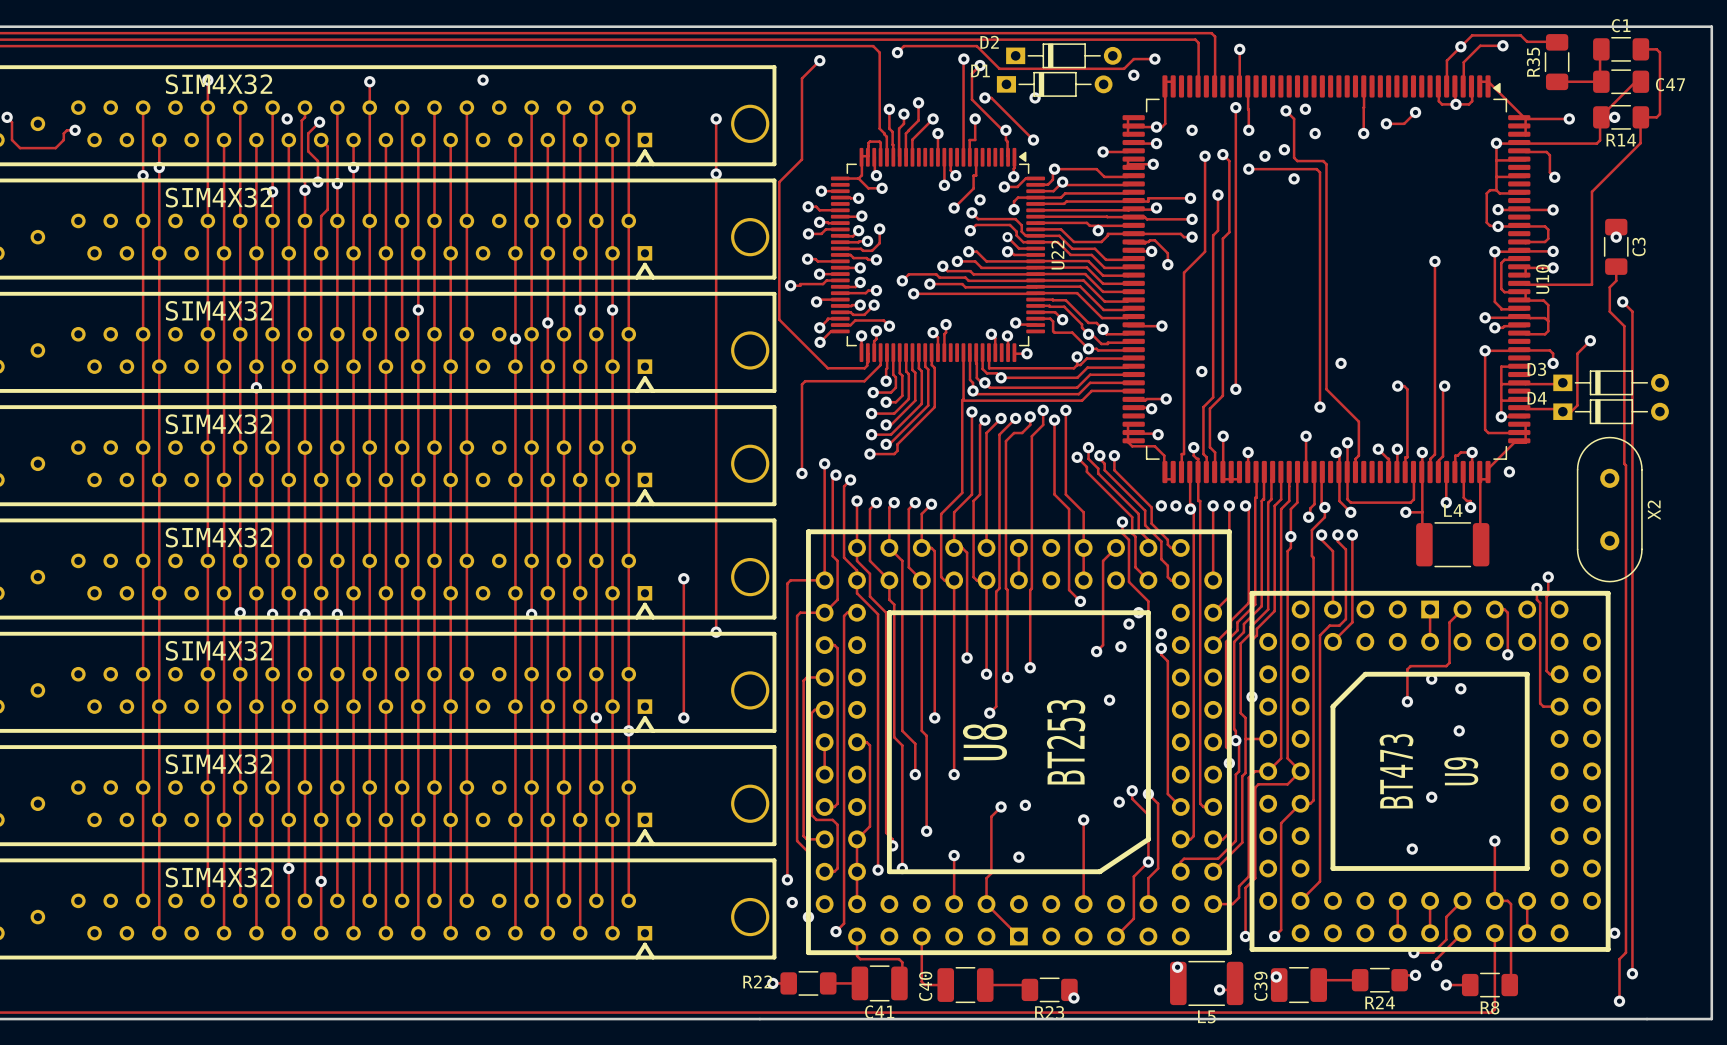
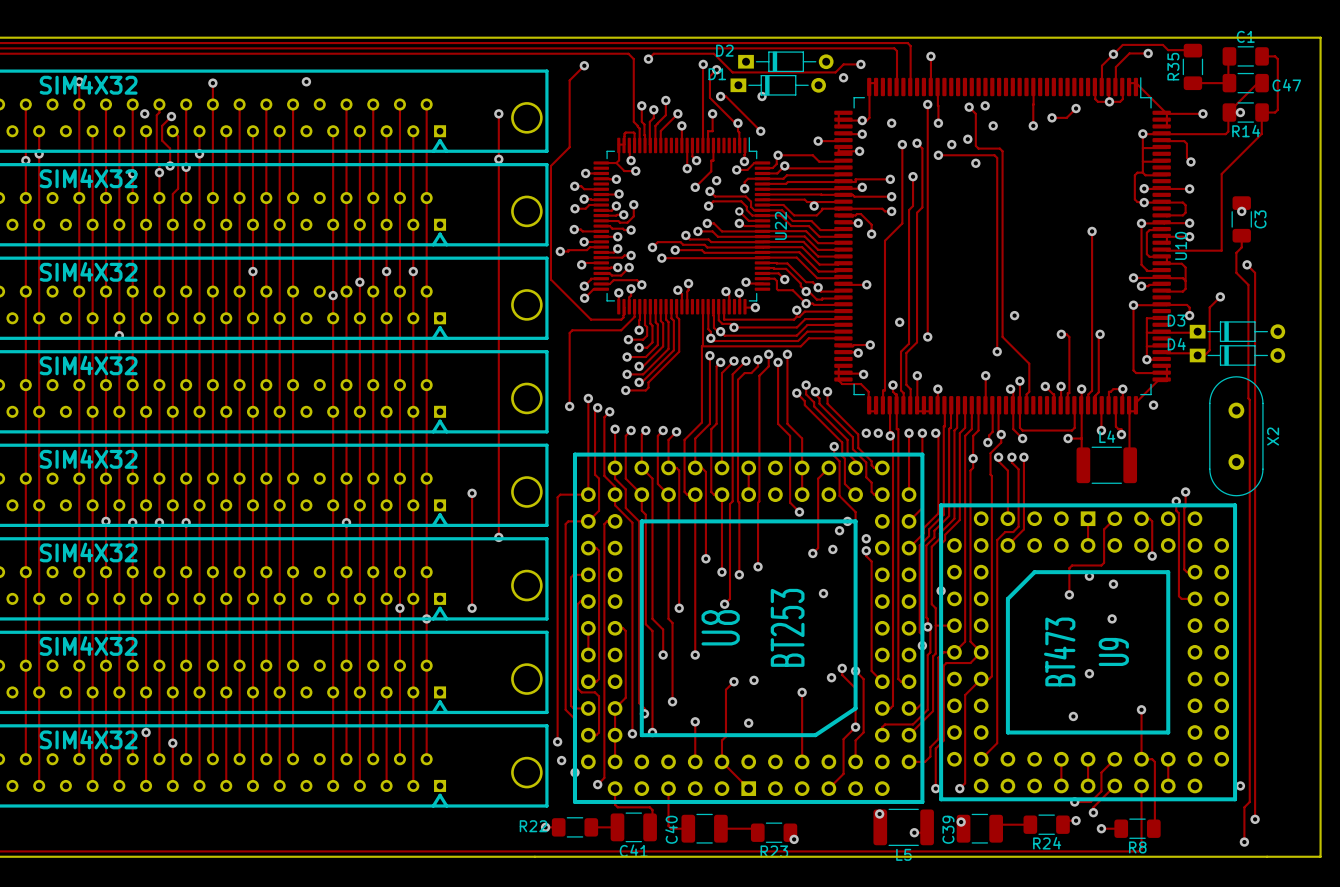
U10 footprint: [1122, 75, 1531, 484] -> [834, 77, 1171, 415]
U22 footprint: [830, 147, 1046, 363] -> [593, 137, 771, 315]

